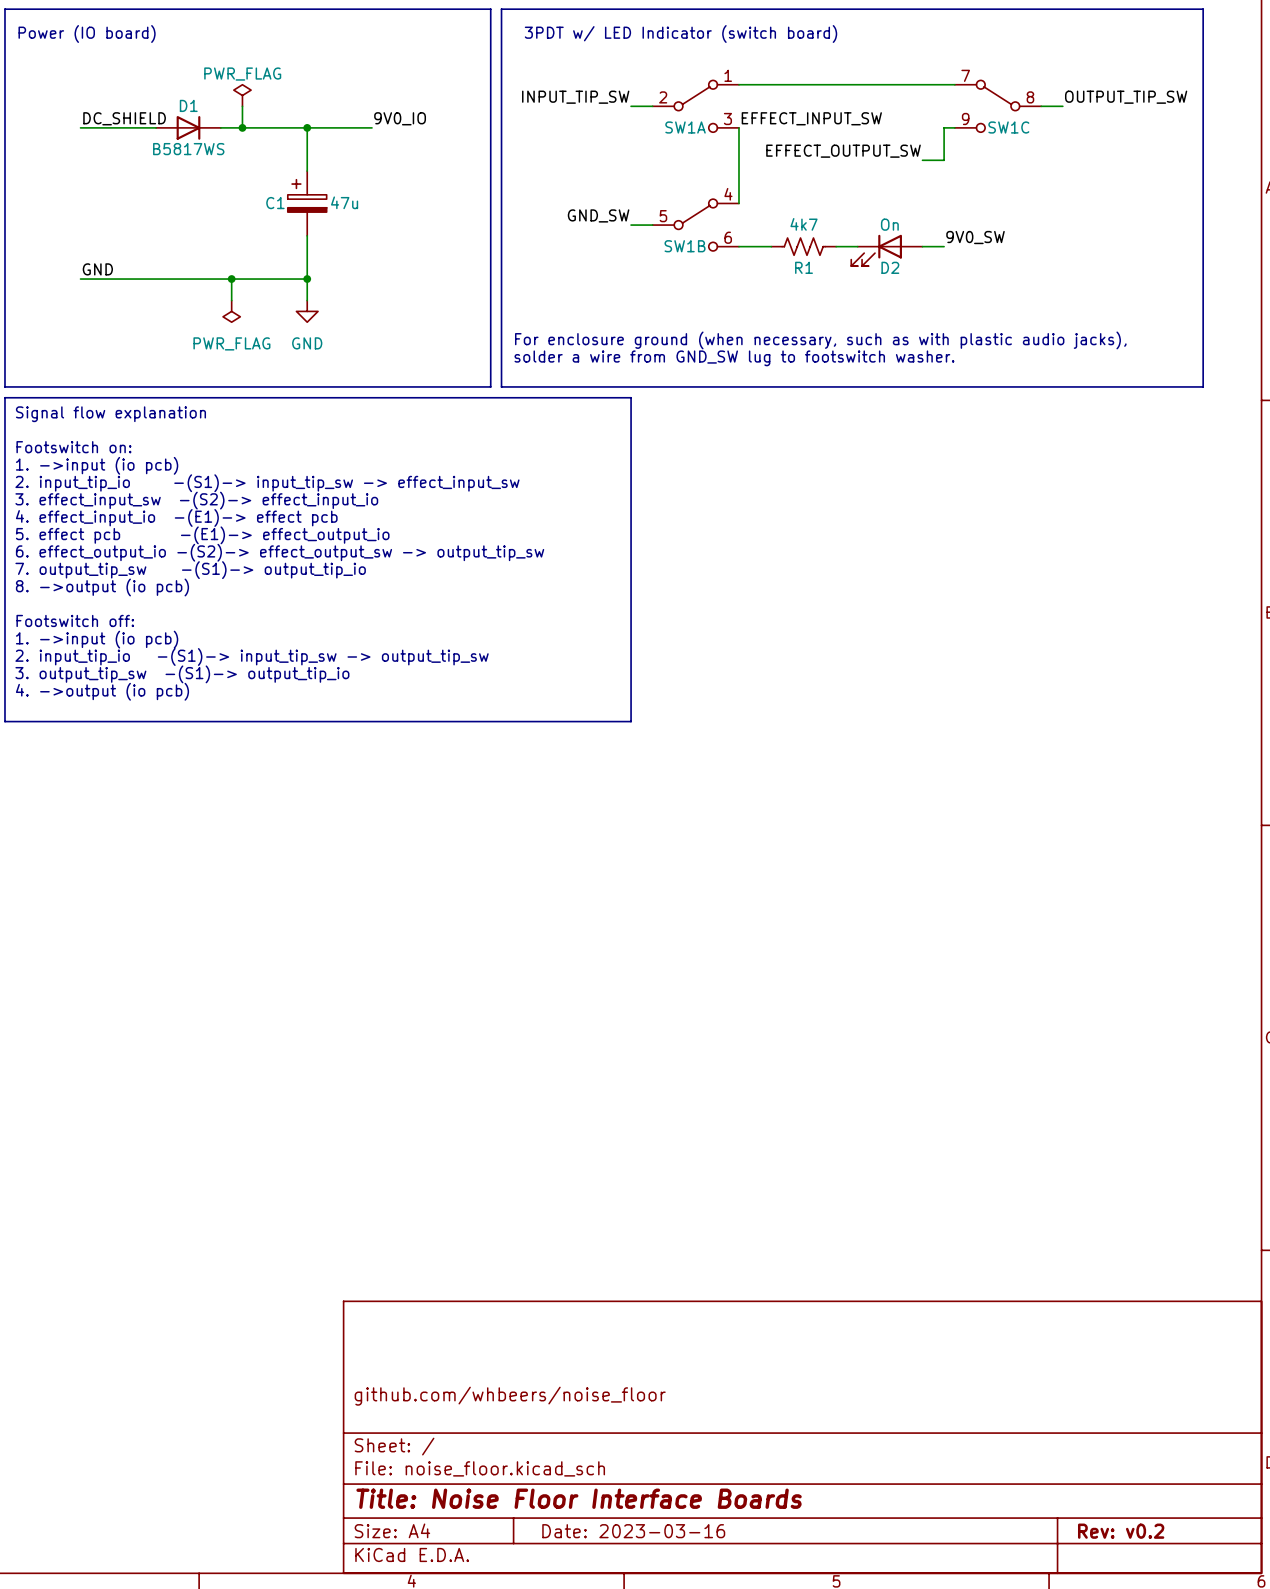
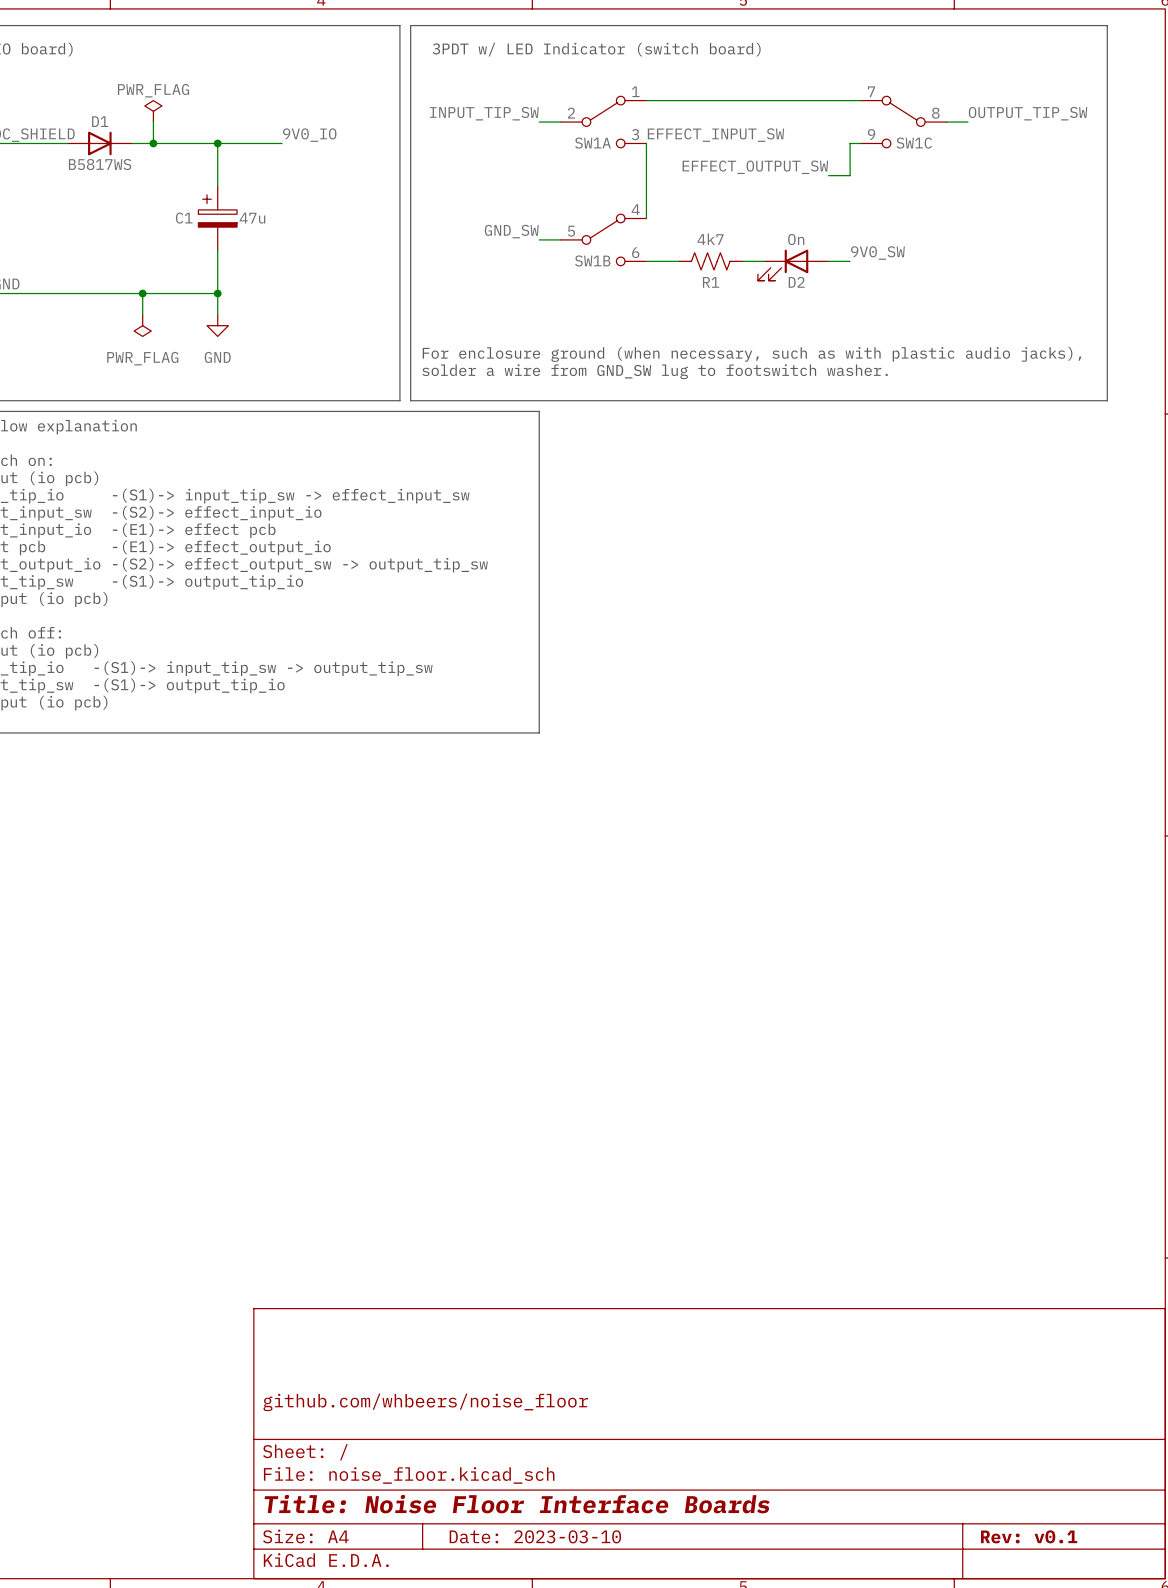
title block: Date: 2023-03-16 (633, 1531) -> Date: 2023-03-10 (535, 1536)
title block: Rev: v0.2 (1121, 1531) -> Rev: v0.1 (1029, 1536)

